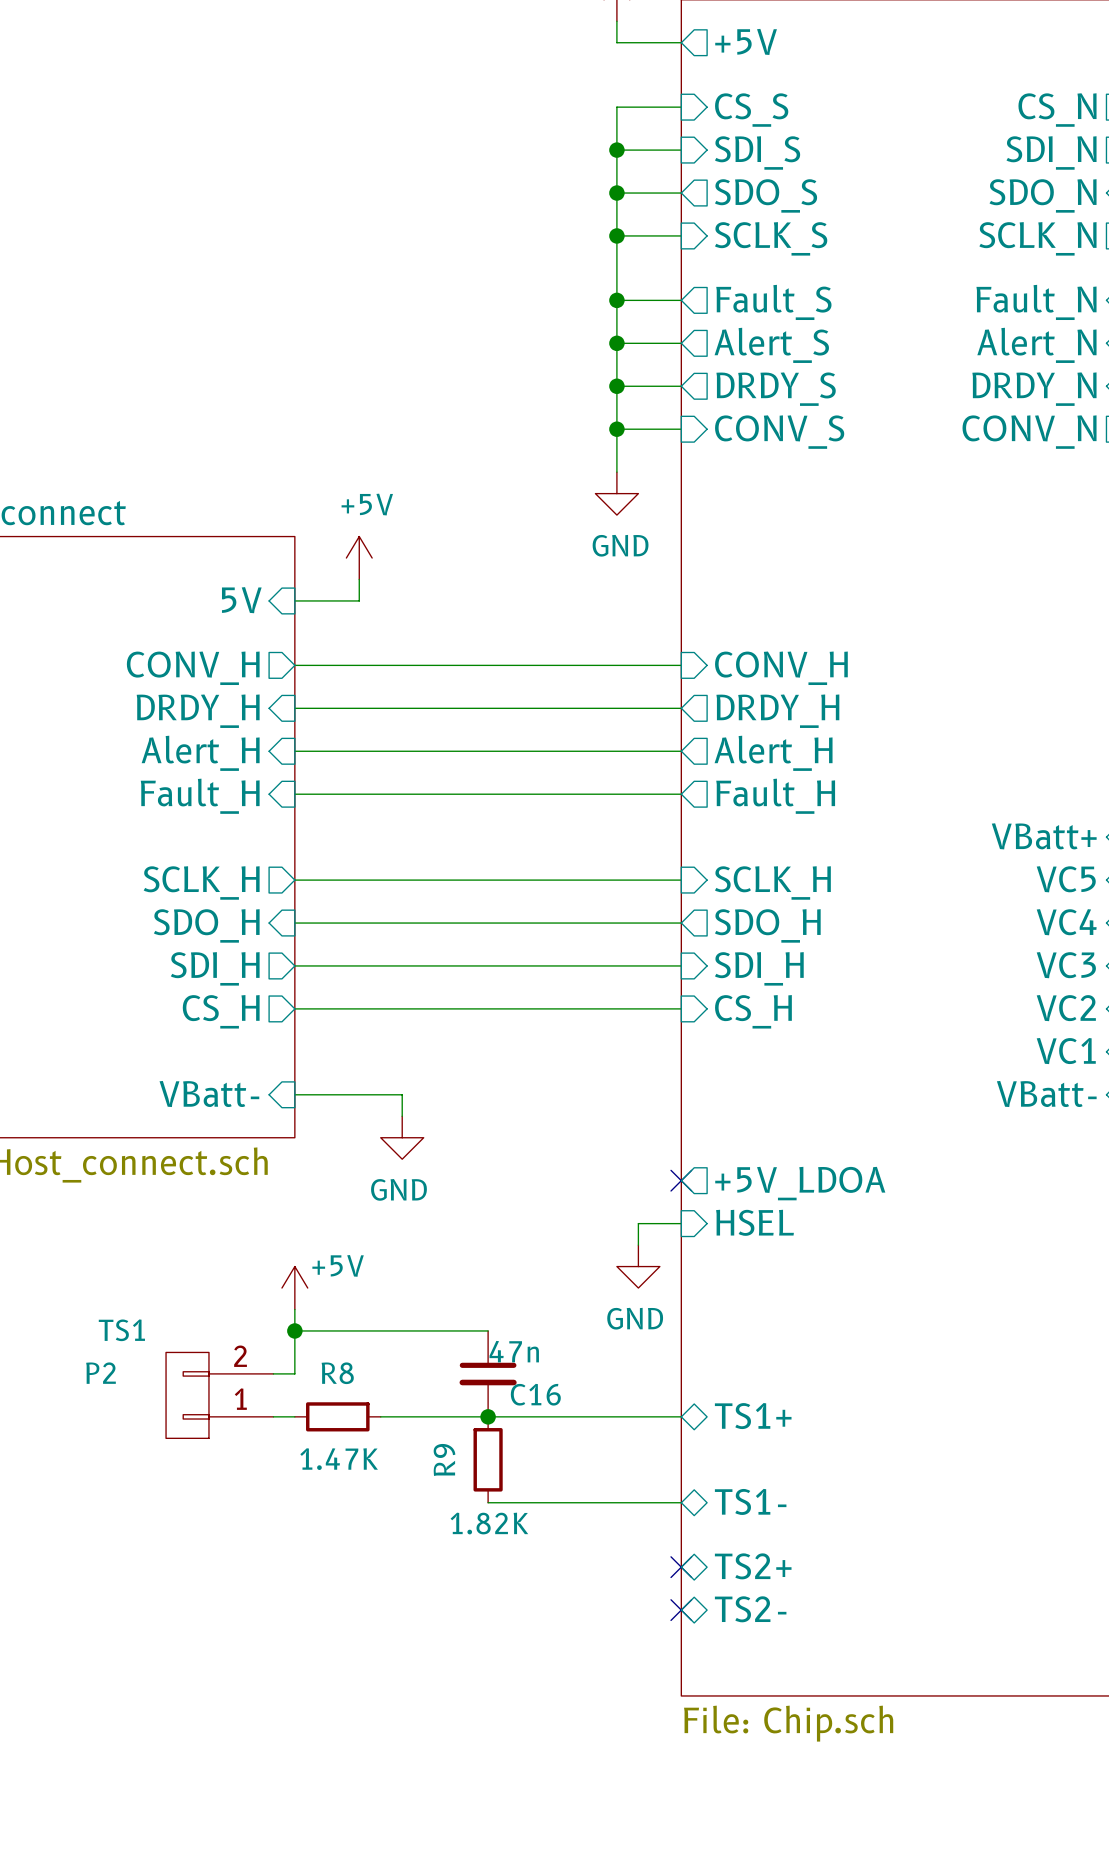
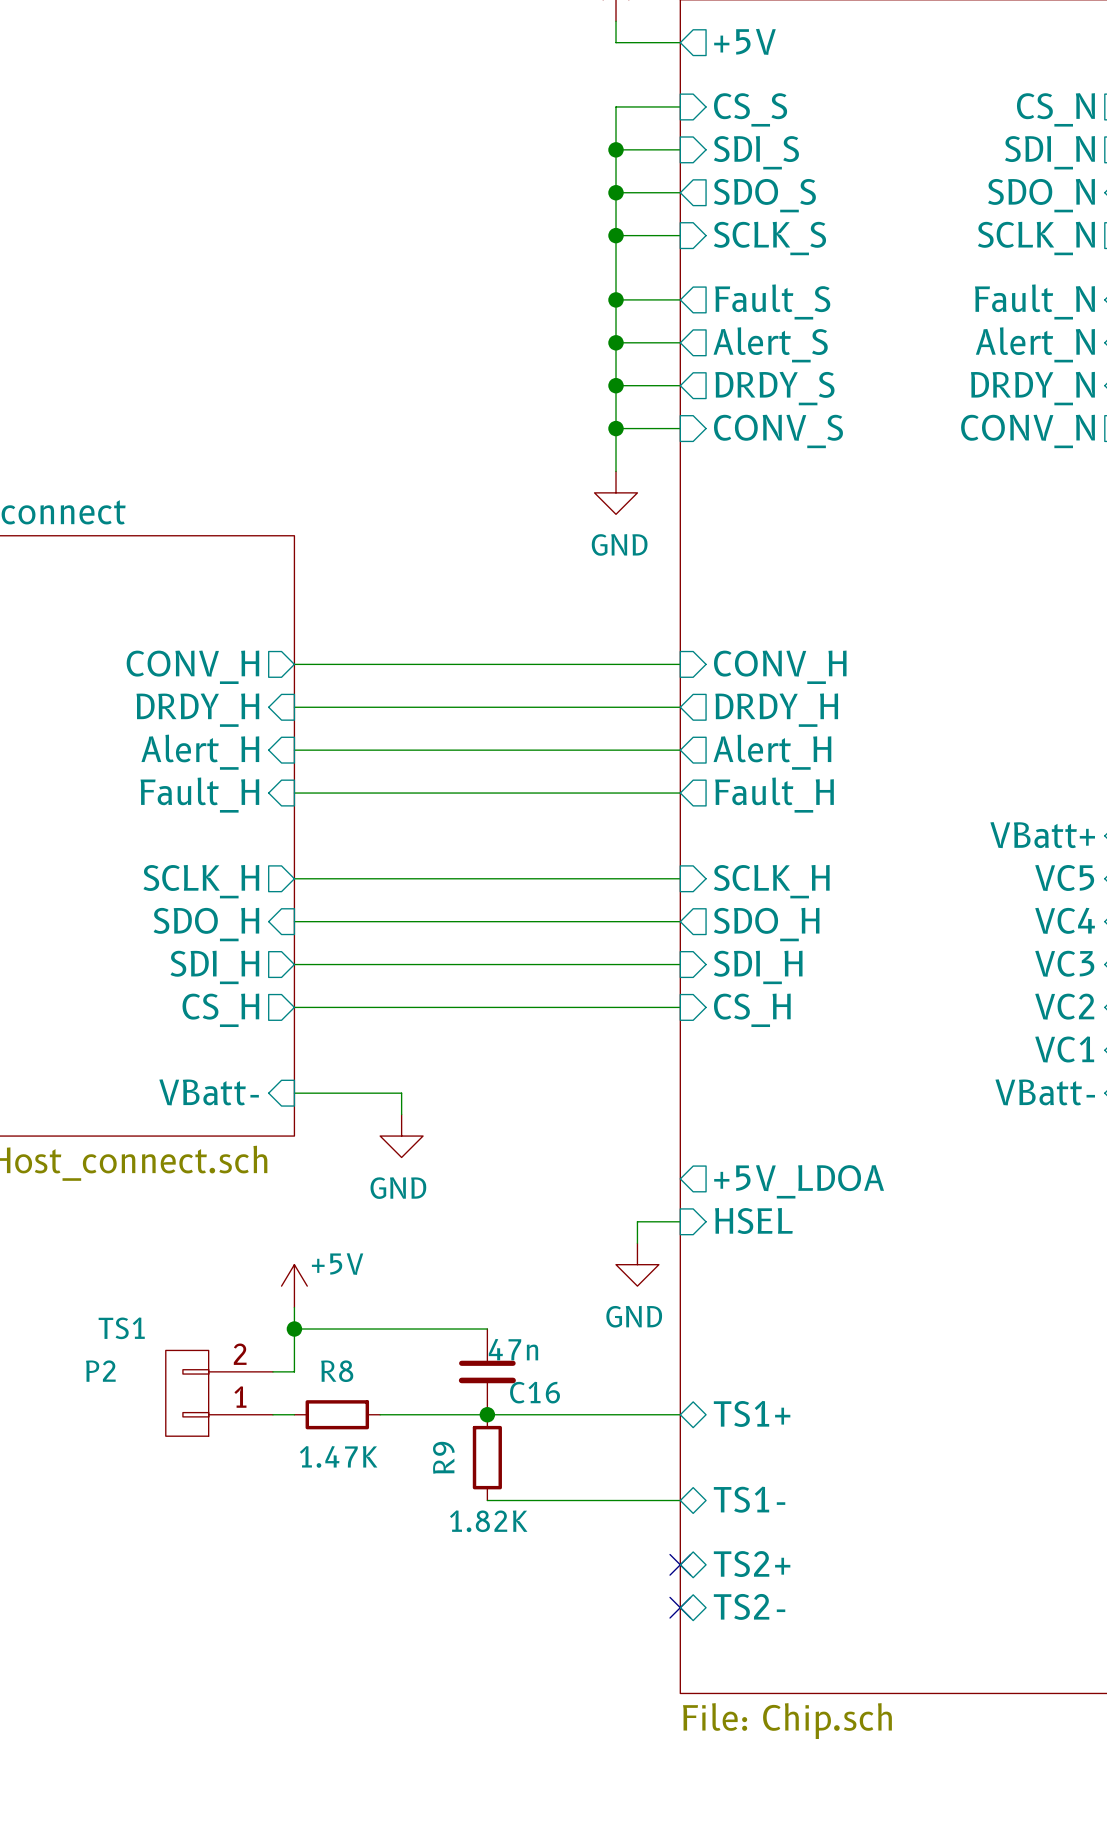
power symbol: +5V (359, 558) -> none
wire: (359, 579) (359, 600) (294, 600) -> none
sheet pin: 5V (241, 600) -> none
no-connect mark: (681, 1180) -> none

